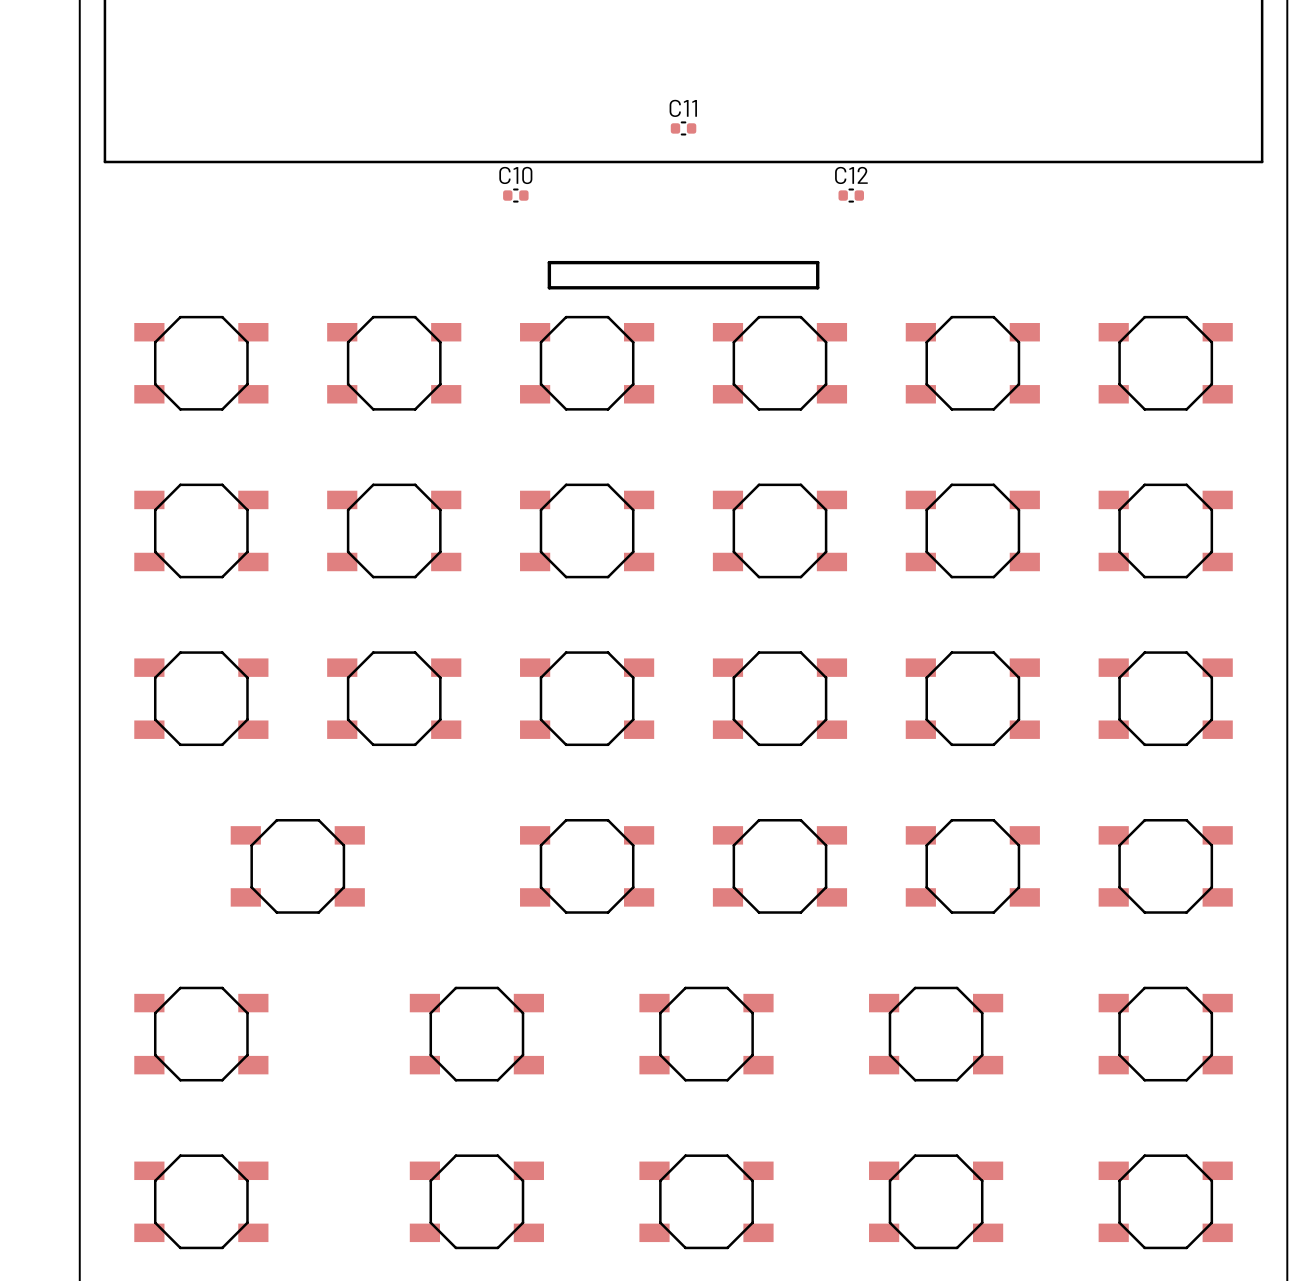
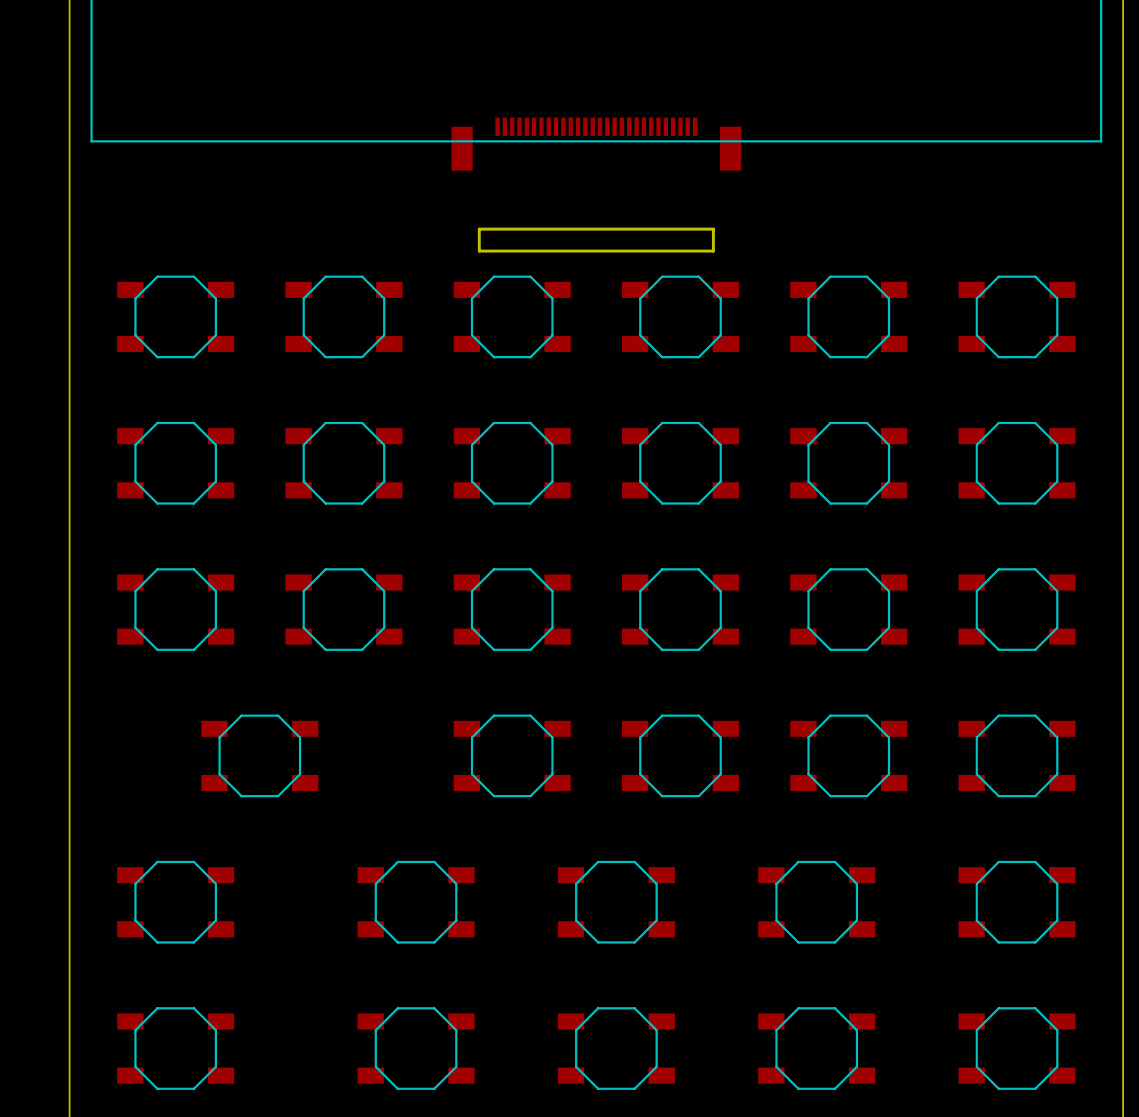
C11: (683, 128) -> none
part: none -> (596, 144)
C10: (515, 195) -> none
C12: (851, 195) -> none

